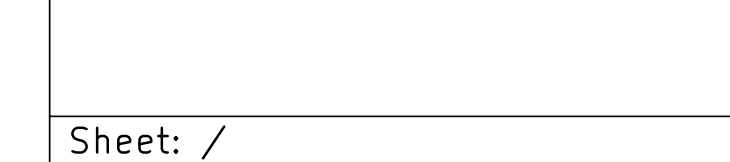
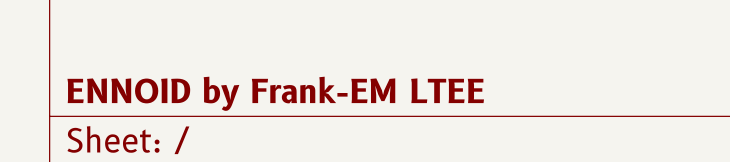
title block: none -> ENNOID by Frank-EM LTEE (275, 93)

